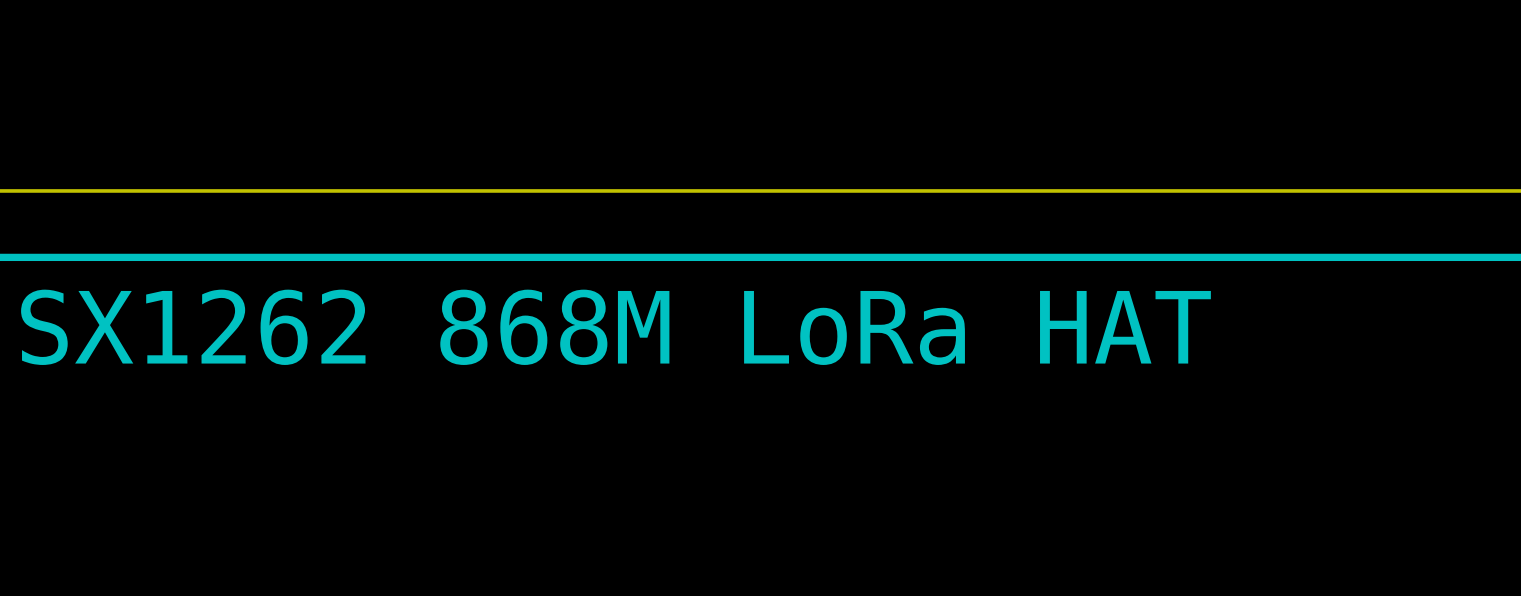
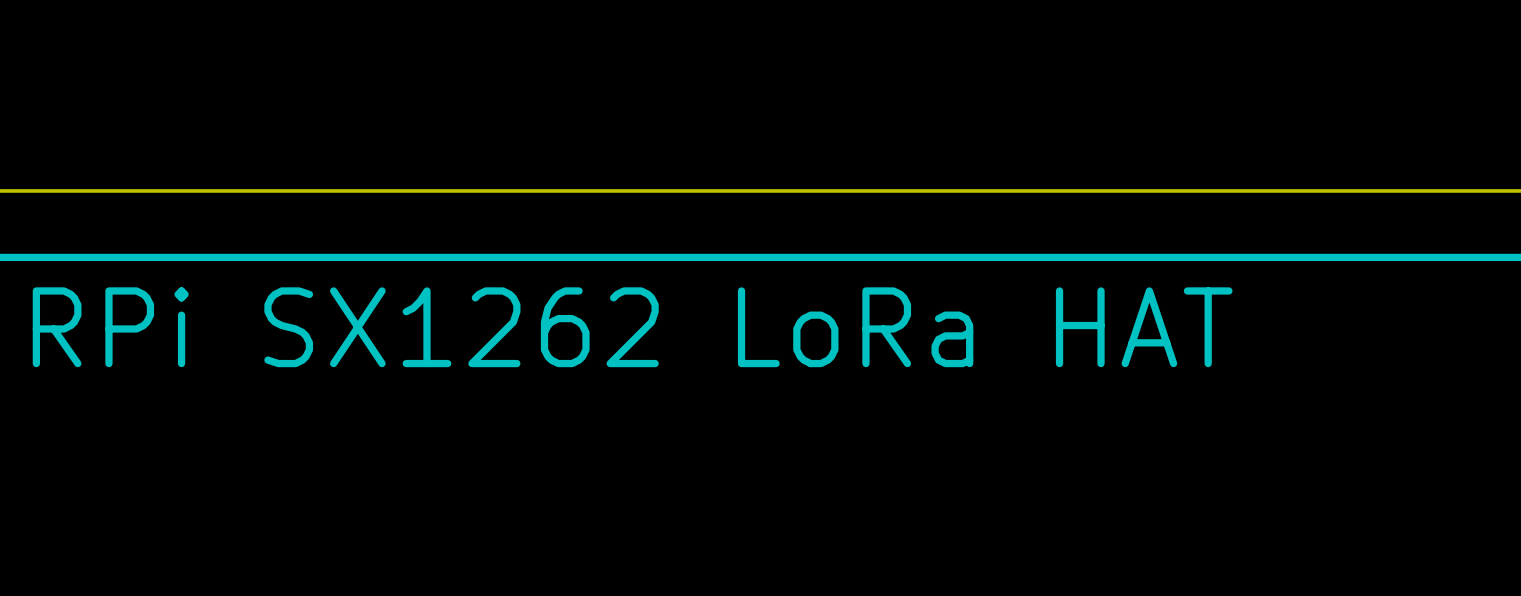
text: SX1262 868M LoRa HAT (615, 327) -> RPi SX1262 LoRa HAT (632, 327)

